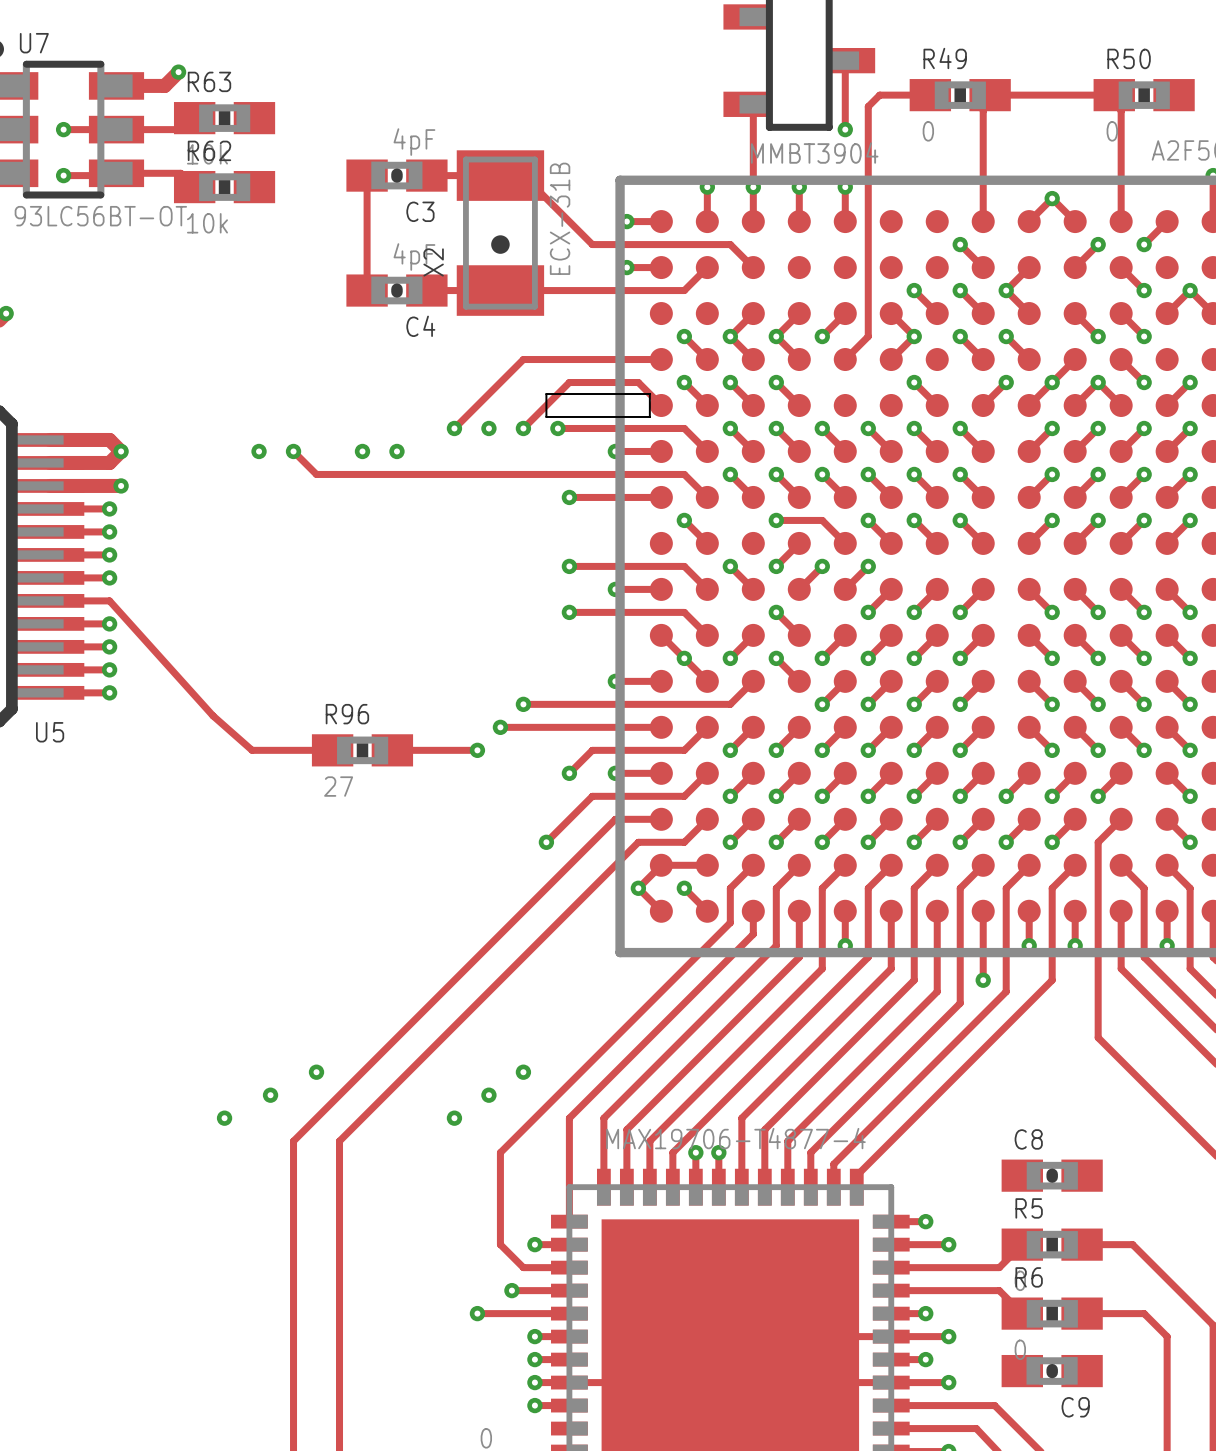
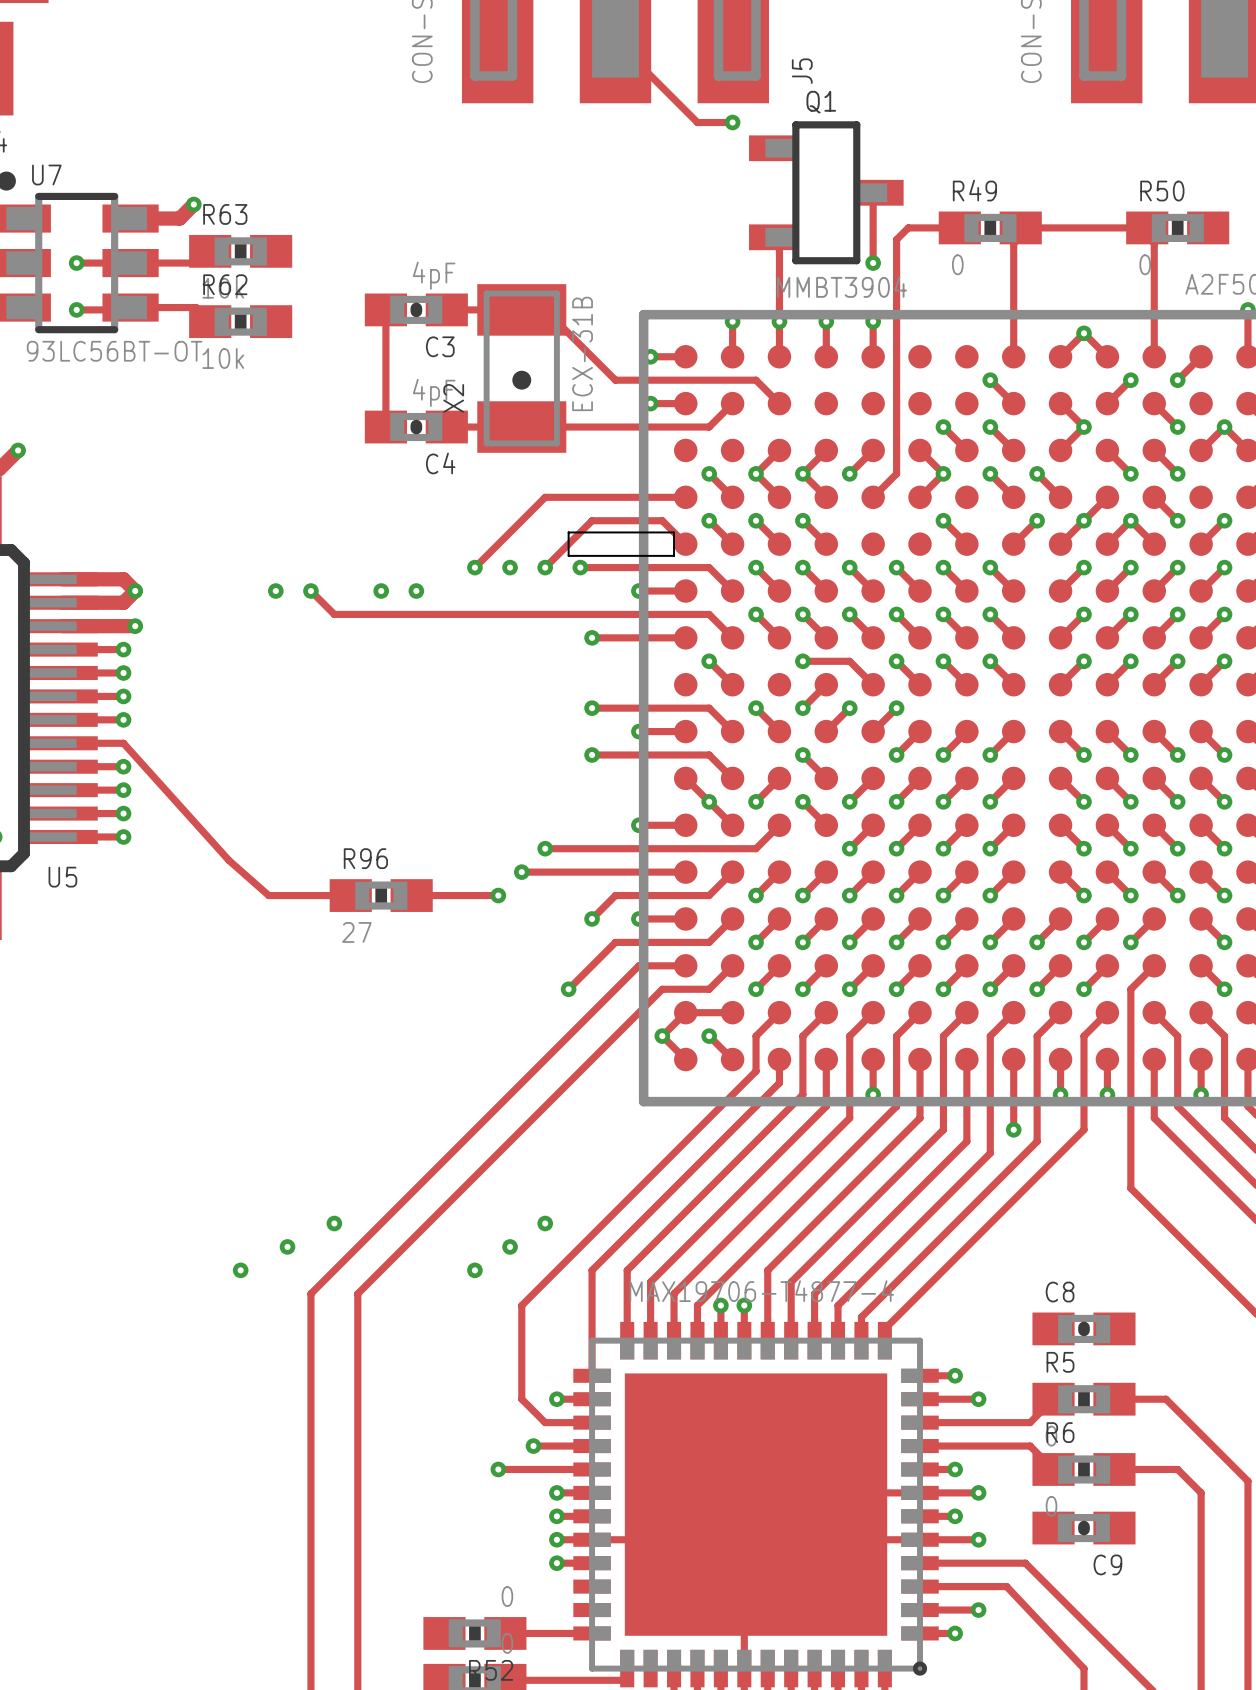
track: (1029, 267) (1006, 290) (1029, 313) -> (1060, 403) (1083, 427) (1060, 450)
via position: (1006, 290) -> (1083, 427)

